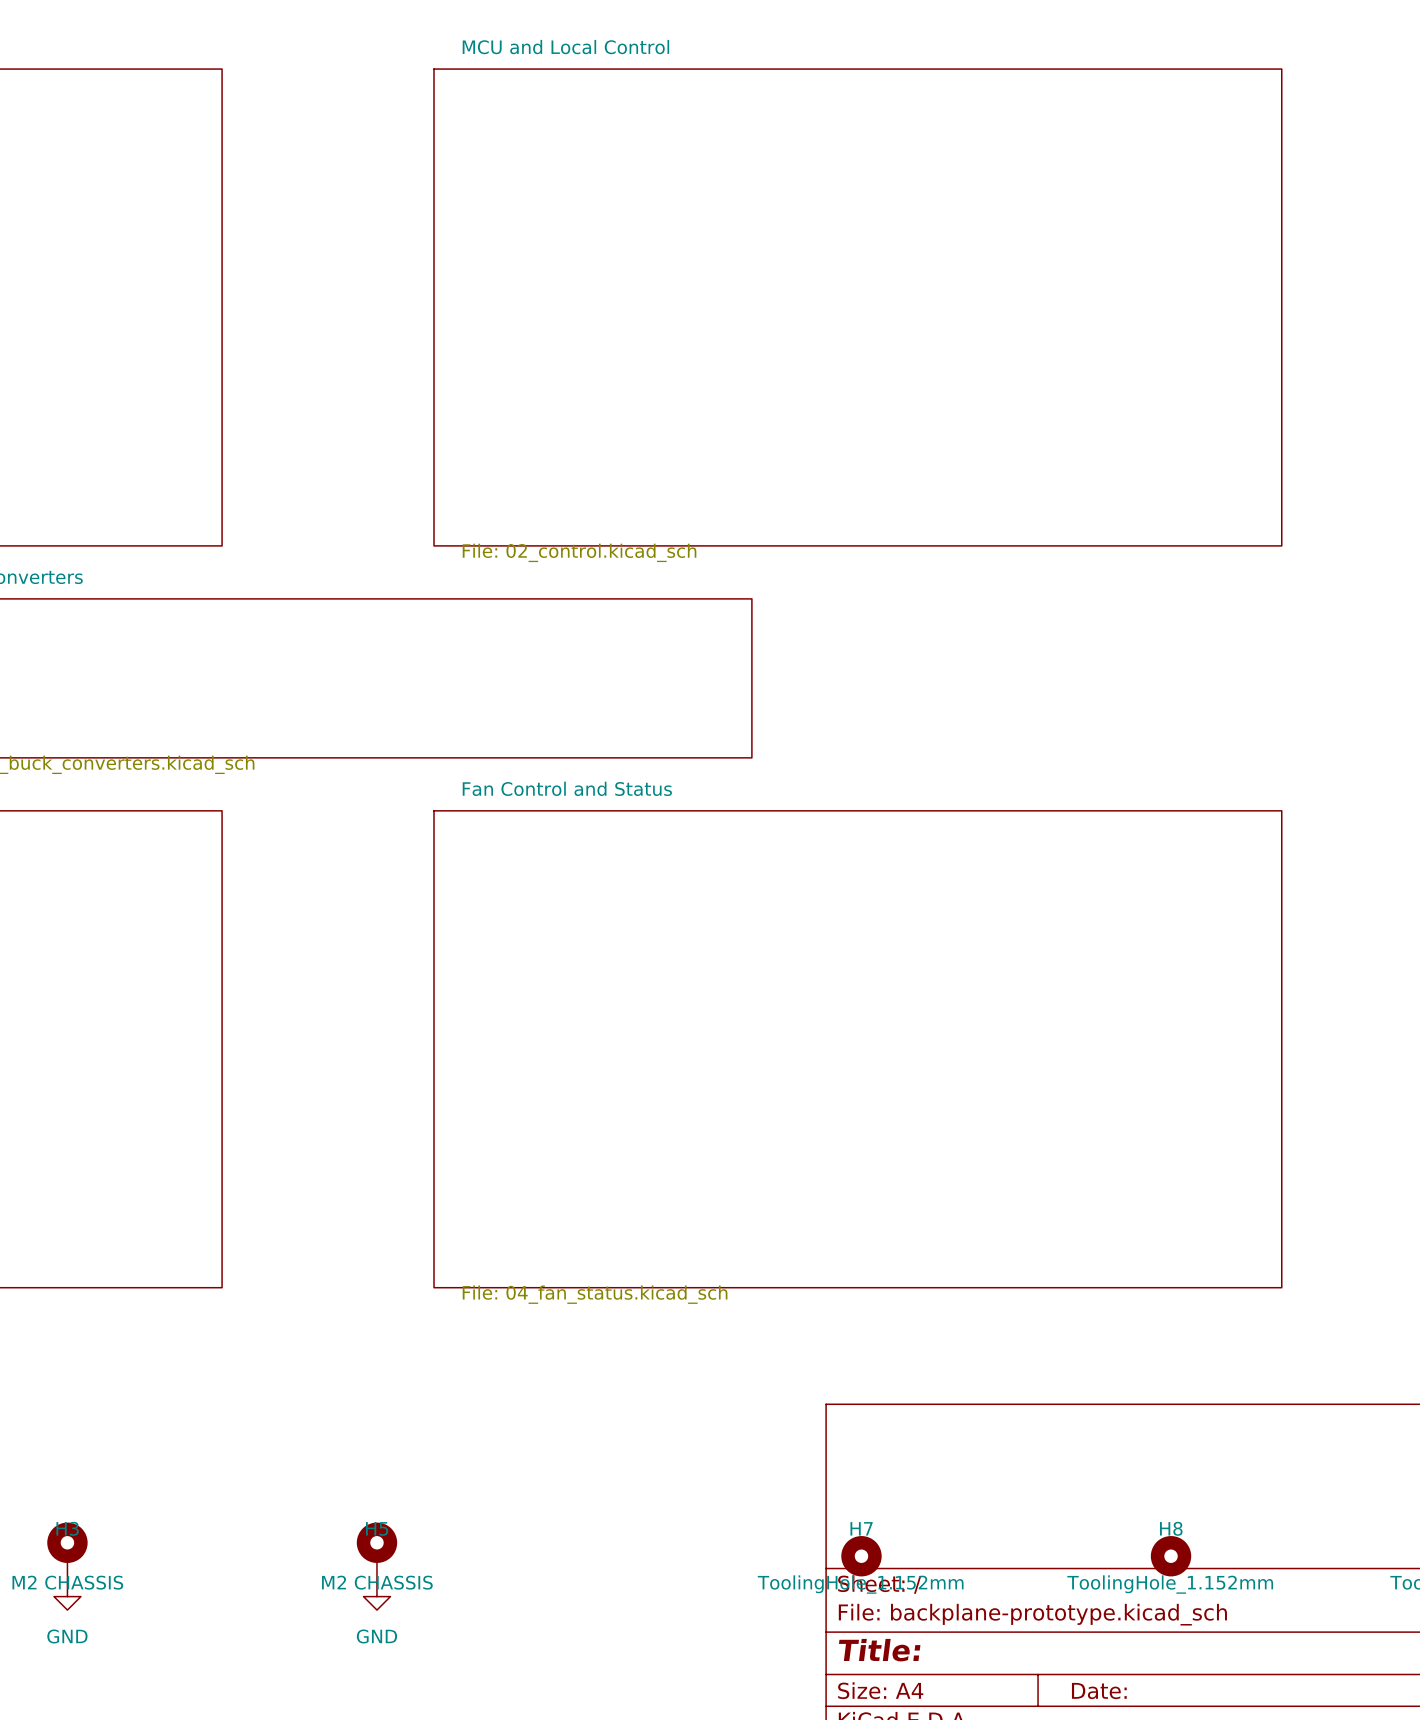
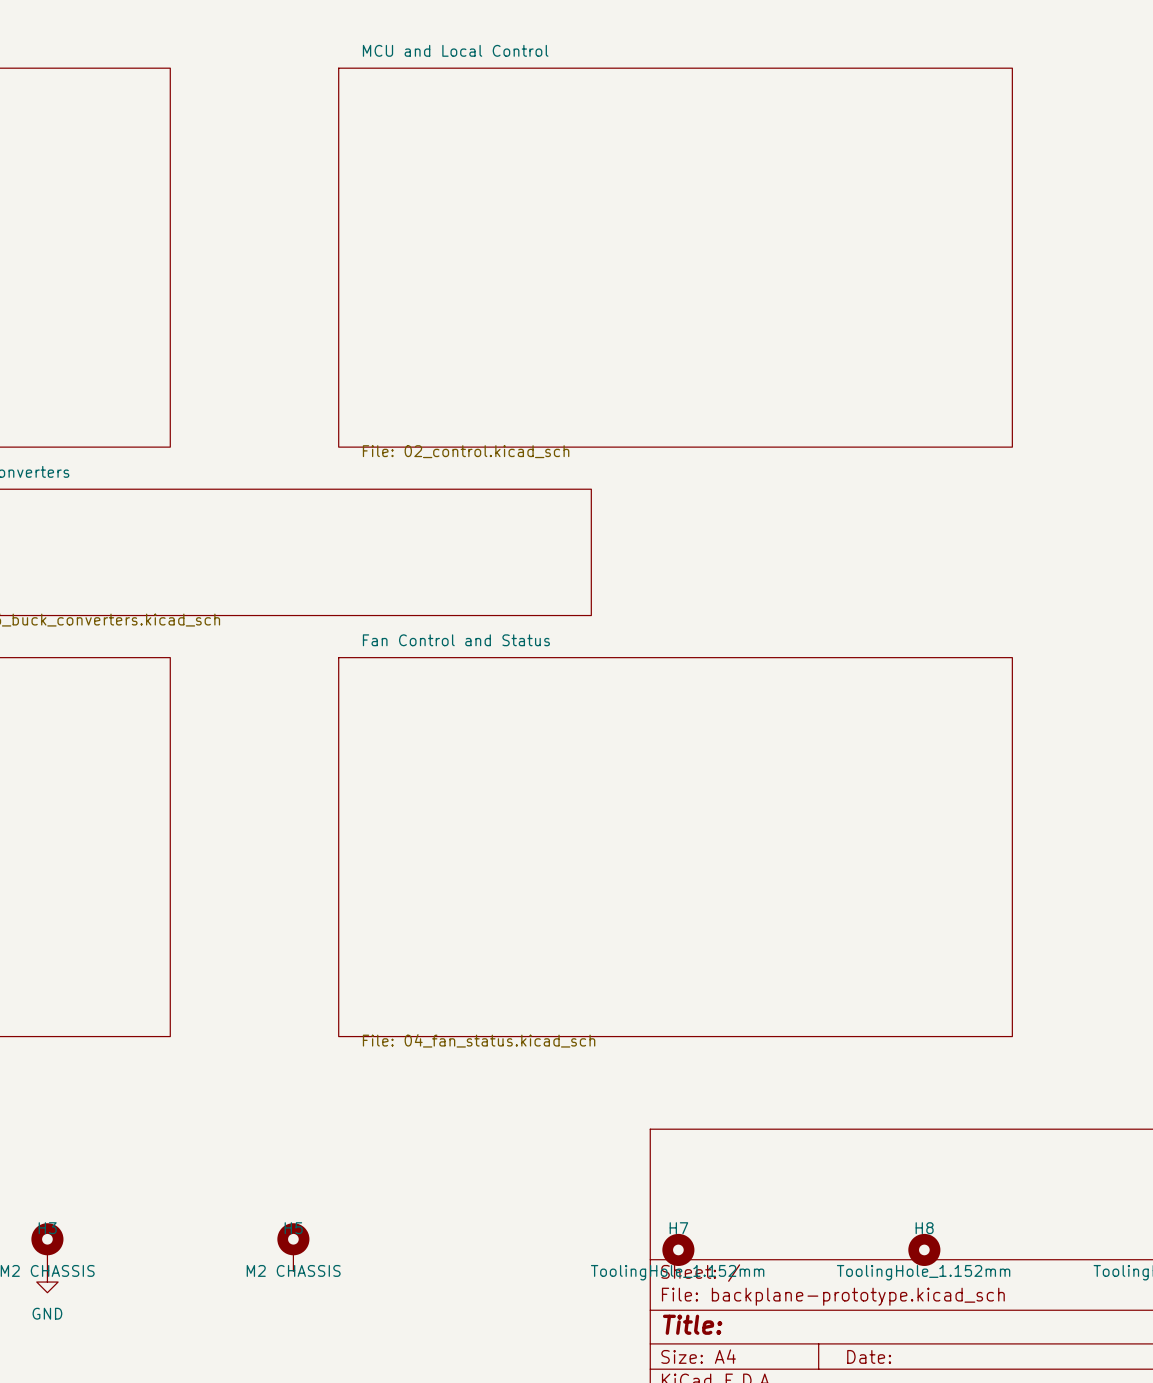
power symbol: GND (376, 1596) -> none

